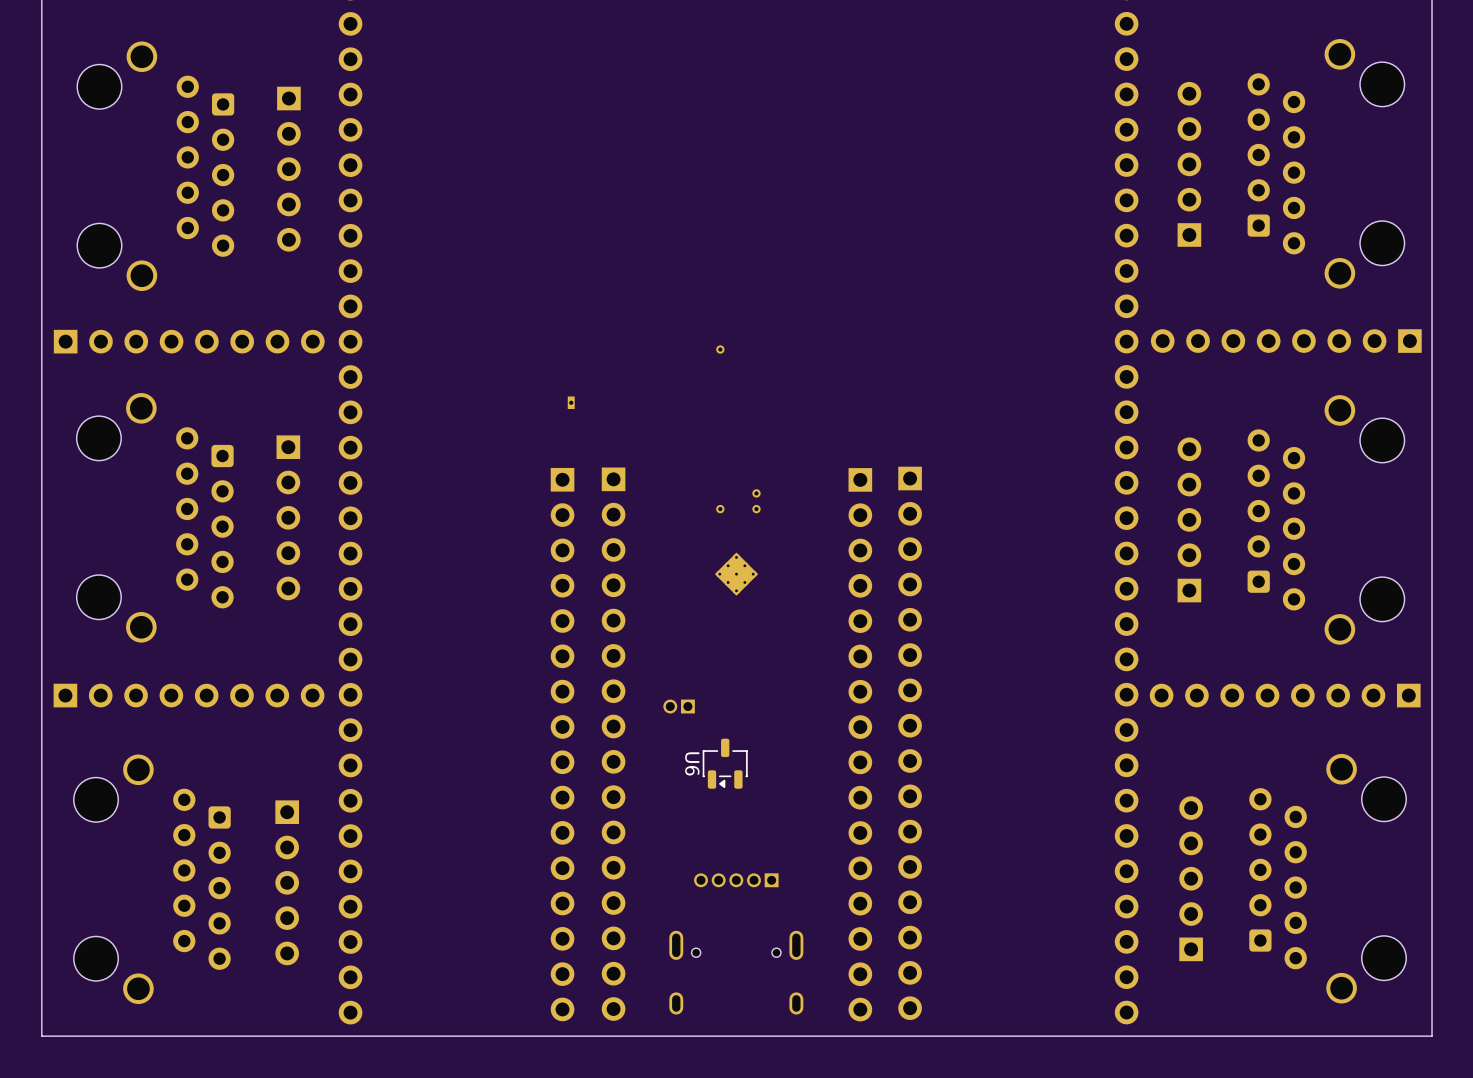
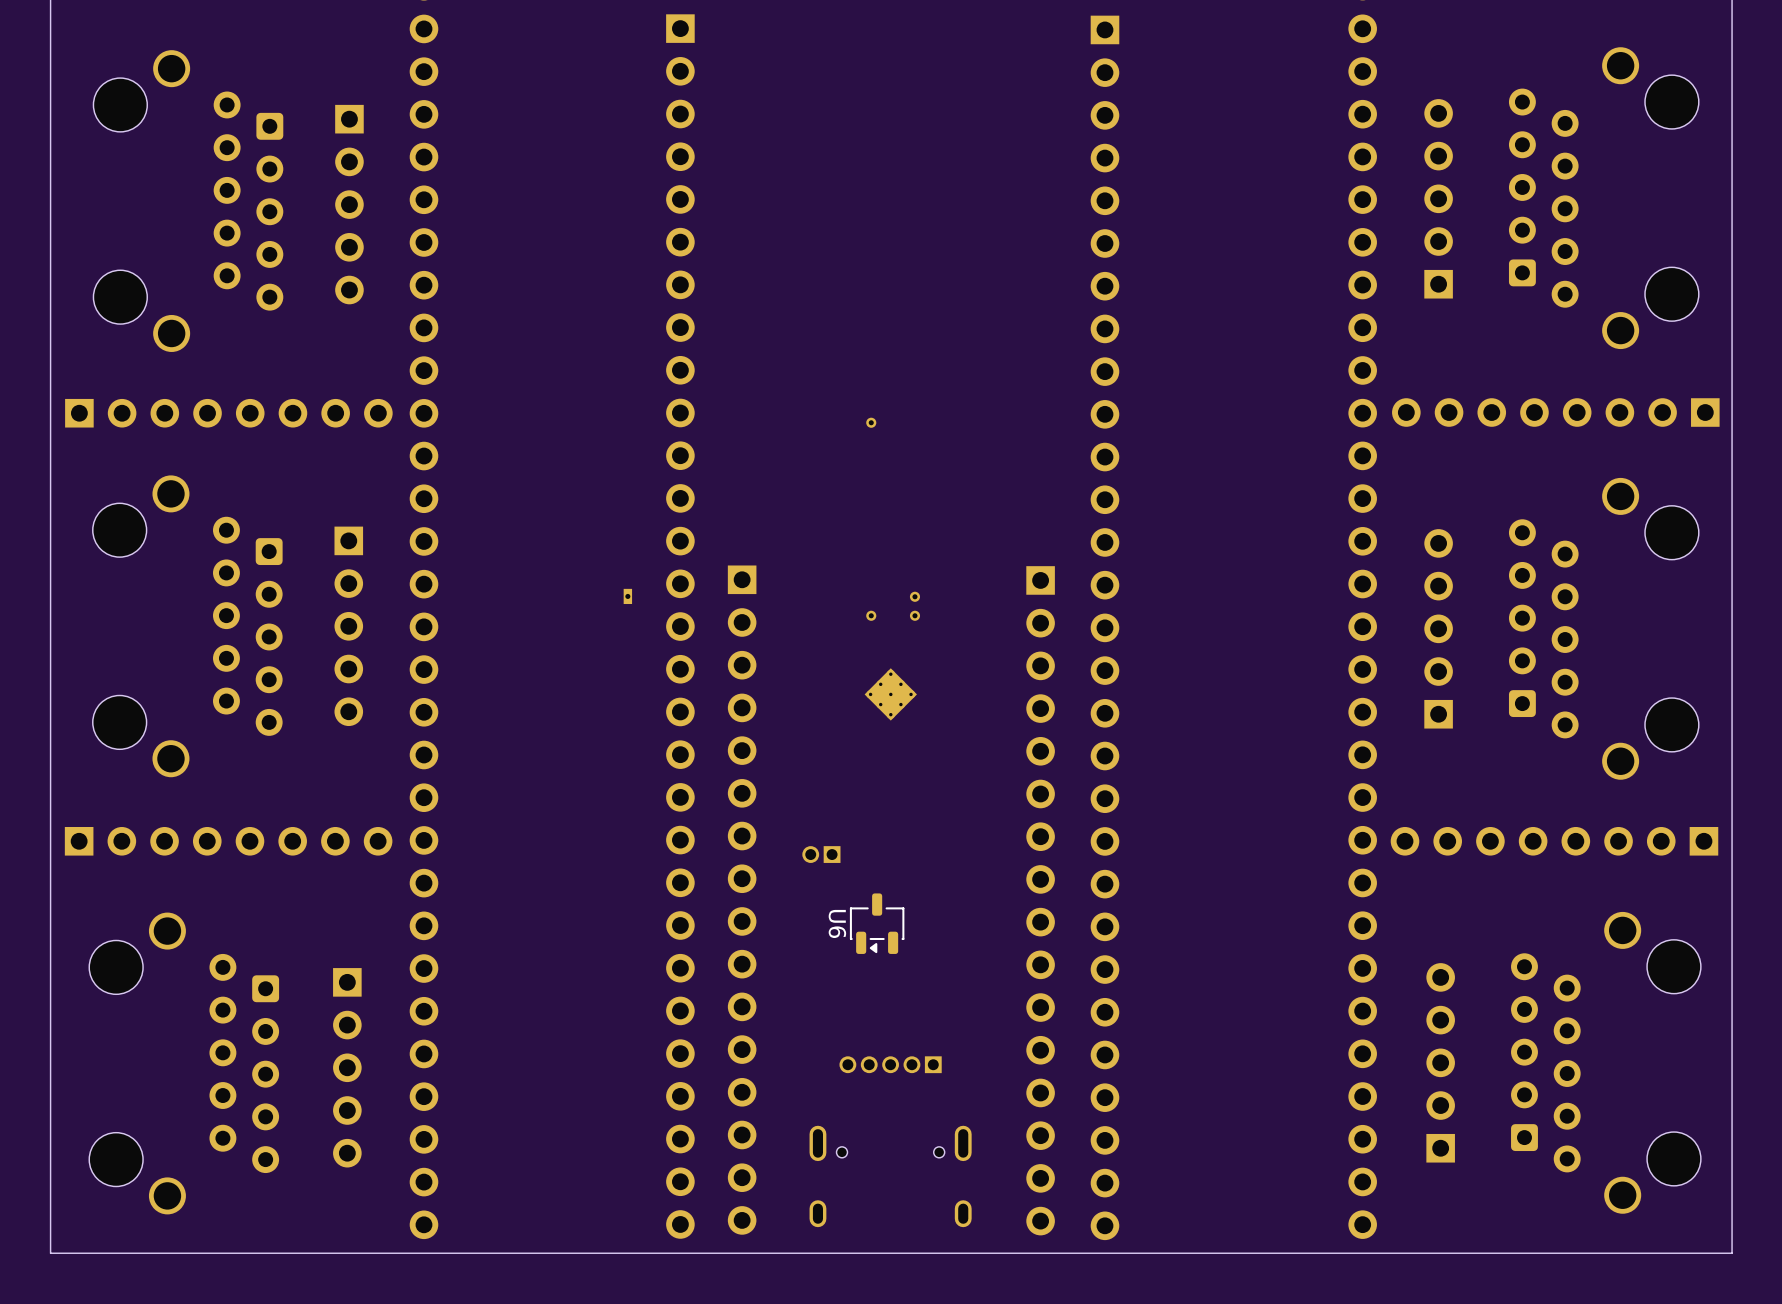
part position: (571, 402) -> (627, 596)
part: none -> (680, 626)
part: none -> (1104, 627)
part: (910, 743) -> none
part: (562, 744) -> none

